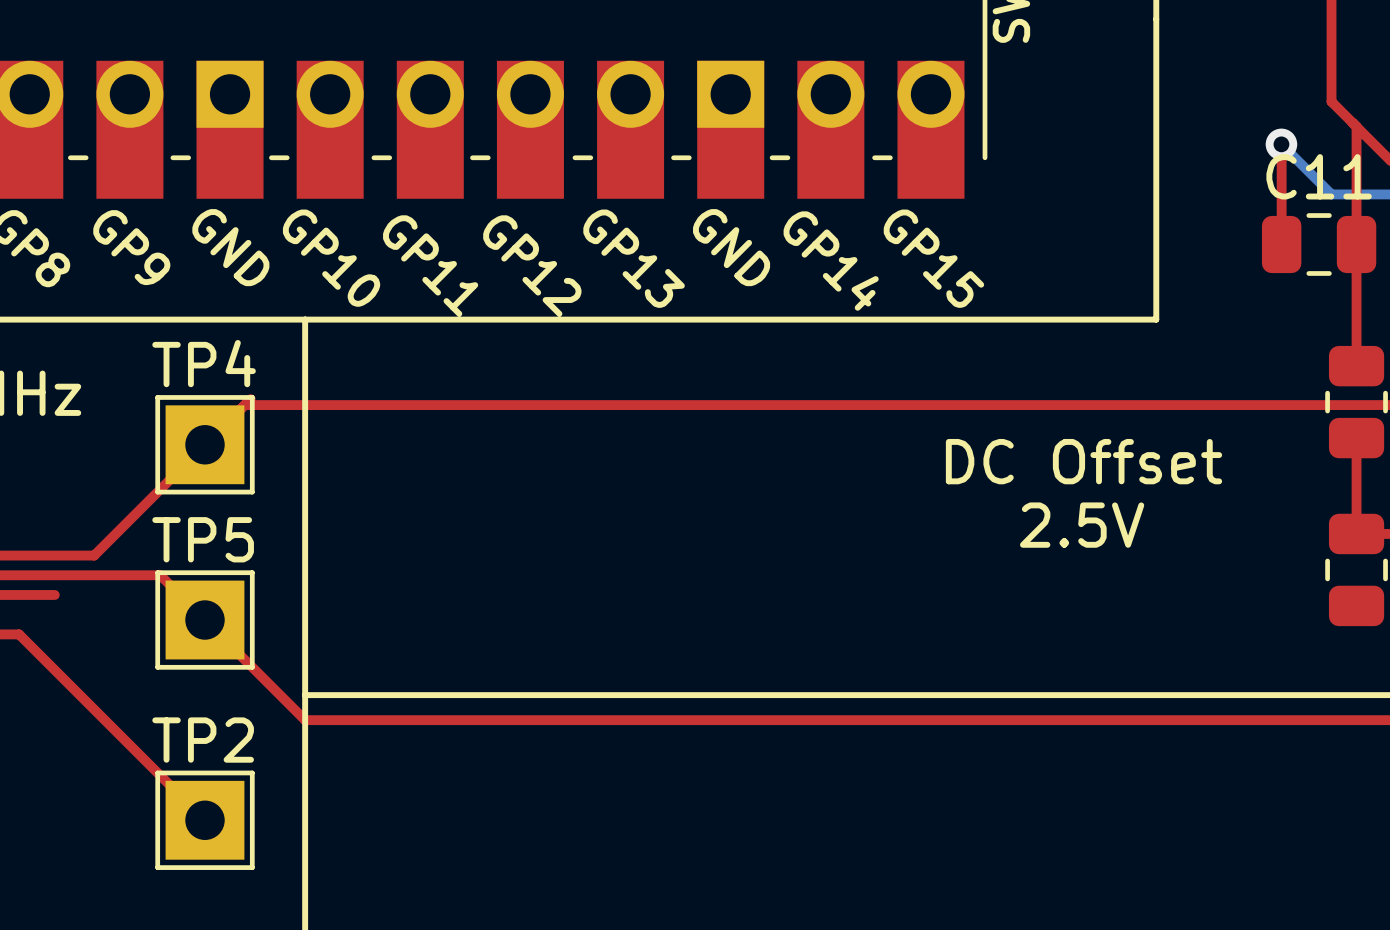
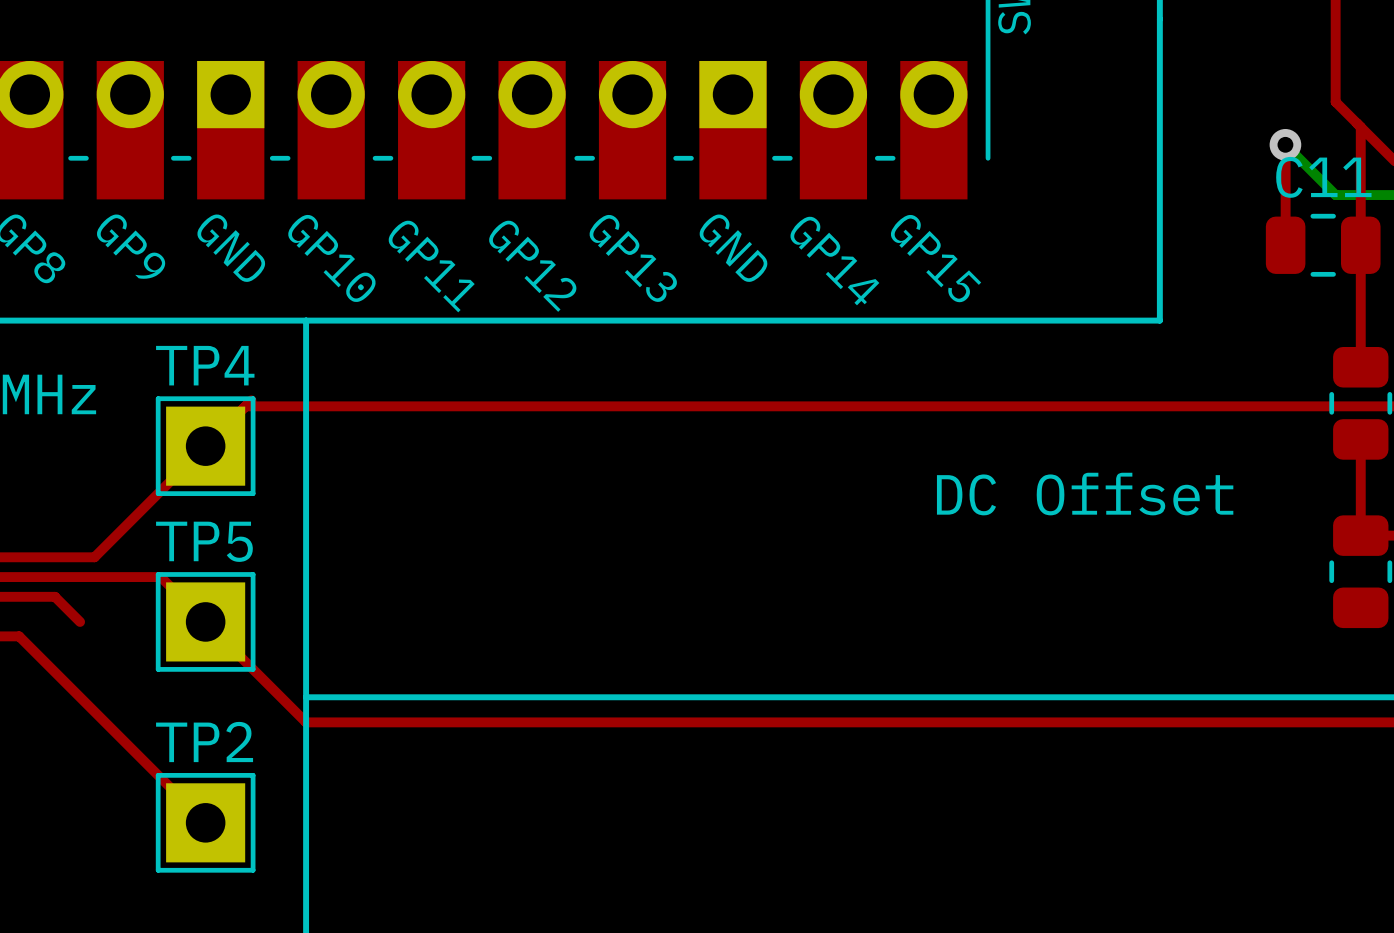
text position: DC Offset (1084, 461) -> DC Offset (1085, 494)
text: 2.5V (1082, 525) -> none
top track: none -> (54, 596) (80, 621)

